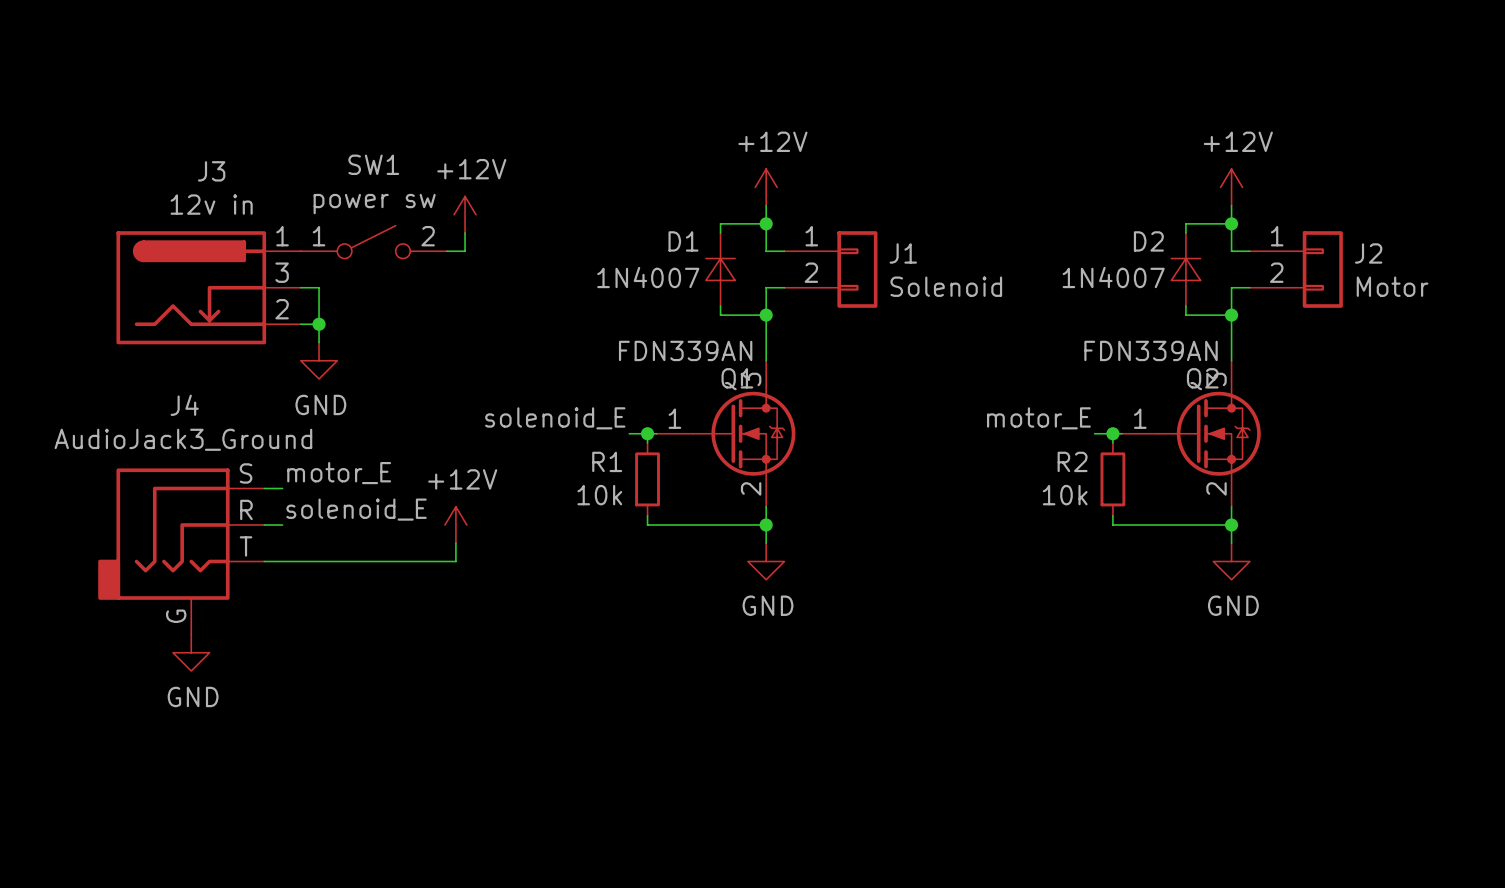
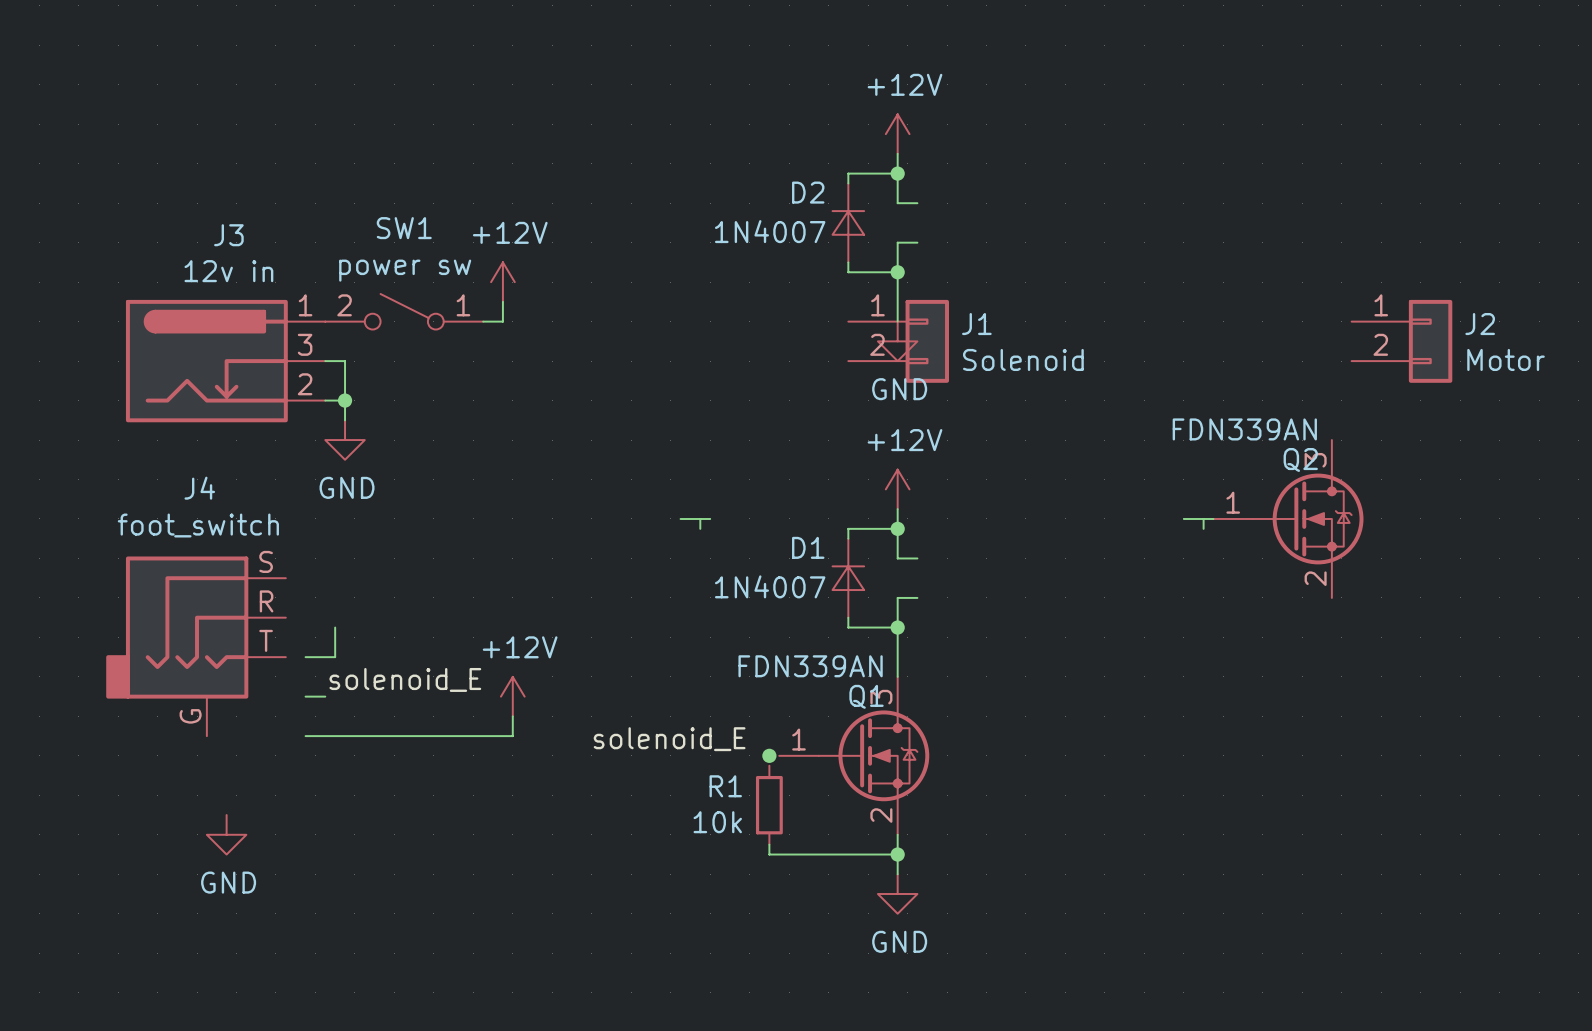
power symbol: none -> +12V (897, 134)
wire: none -> (897, 153) (897, 203) (917, 203)
wire: none -> (897, 173) (848, 173) (848, 183)
junction: none -> (897, 173)
wire: none -> (917, 242) (897, 242) (897, 321)
power symbol: +12V (766, 187) -> none
power symbol: +12V (1231, 187) -> none
wire: none -> (848, 262) (848, 272) (897, 272)
wire: (766, 205) (766, 251) (784, 251) -> (897, 509) (897, 558) (917, 558)
junction: none -> (897, 272)
wire: (1231, 205) (1231, 251) (1249, 251) -> none
wire: (766, 223) (720, 223) (720, 232) -> (897, 528) (848, 528) (848, 538)
junction: (766, 223) -> none
wire: (1231, 223) (1185, 223) (1185, 232) -> none
junction: (1231, 223) -> none
SW1 flip: as is (373, 242) -> left-right (404, 311)
D1 position: (720, 269) -> (848, 578)
power symbol: none -> GND (897, 341)
D2 position: (1185, 269) -> (848, 222)
wire: (784, 287) (766, 287) (766, 360) -> (917, 597) (897, 597) (897, 676)
wire: (1249, 287) (1231, 287) (1231, 360) -> none
wire: (720, 305) (720, 315) (766, 315) -> (848, 617) (848, 627) (897, 627)
wire: (1185, 305) (1185, 315) (1231, 315) -> none
junction: (766, 315) -> none
junction: (1231, 315) -> none
power symbol: none -> +12V (897, 489)
label: solenoid_E (555, 418) -> none
label: motor_E (1038, 418) -> none
junction: (647, 433) -> none
Q1 position: (726, 433) -> (854, 755)
junction: (1112, 433) -> none
J4 value: AudioJack3_Ground (183, 439) -> foot_switch (198, 525)
junction: none -> (897, 528)
label: motor_E (339, 473) -> none
R1 position: (647, 479) -> (769, 805)
R2: 10k (1112, 479) -> none
wire: (264, 488) (282, 488) -> none
wire: (766, 506) (766, 543) -> (897, 834) (897, 874)
wire: (1231, 506) (1231, 543) -> none
label position: solenoid_E (356, 509) -> solenoid_E (405, 679)
wire: (647, 515) (647, 525) (766, 525) -> (769, 844) (769, 854) (897, 854)
wire: (1112, 515) (1112, 525) (1231, 525) -> none
wire: (264, 525) (282, 525) -> none
power symbol position: +12V (455, 525) -> +12V (512, 696)
junction: (766, 525) -> none
junction: (1231, 525) -> none
junction: none -> (897, 627)
wire: (455, 543) (455, 561) (309, 561) -> (335, 627) (335, 657)
wire: (264, 561) (282, 561) -> (305, 696) (325, 696)
power symbol: GND (766, 561) -> none
power symbol: GND (1231, 561) -> none
wire: none -> (512, 716) (512, 736) (305, 736)
label: none -> solenoid_E (669, 739)
power symbol position: GND (191, 652) -> GND (226, 834)
junction: none -> (769, 755)
junction: none -> (897, 854)
power symbol: none -> GND (897, 894)

